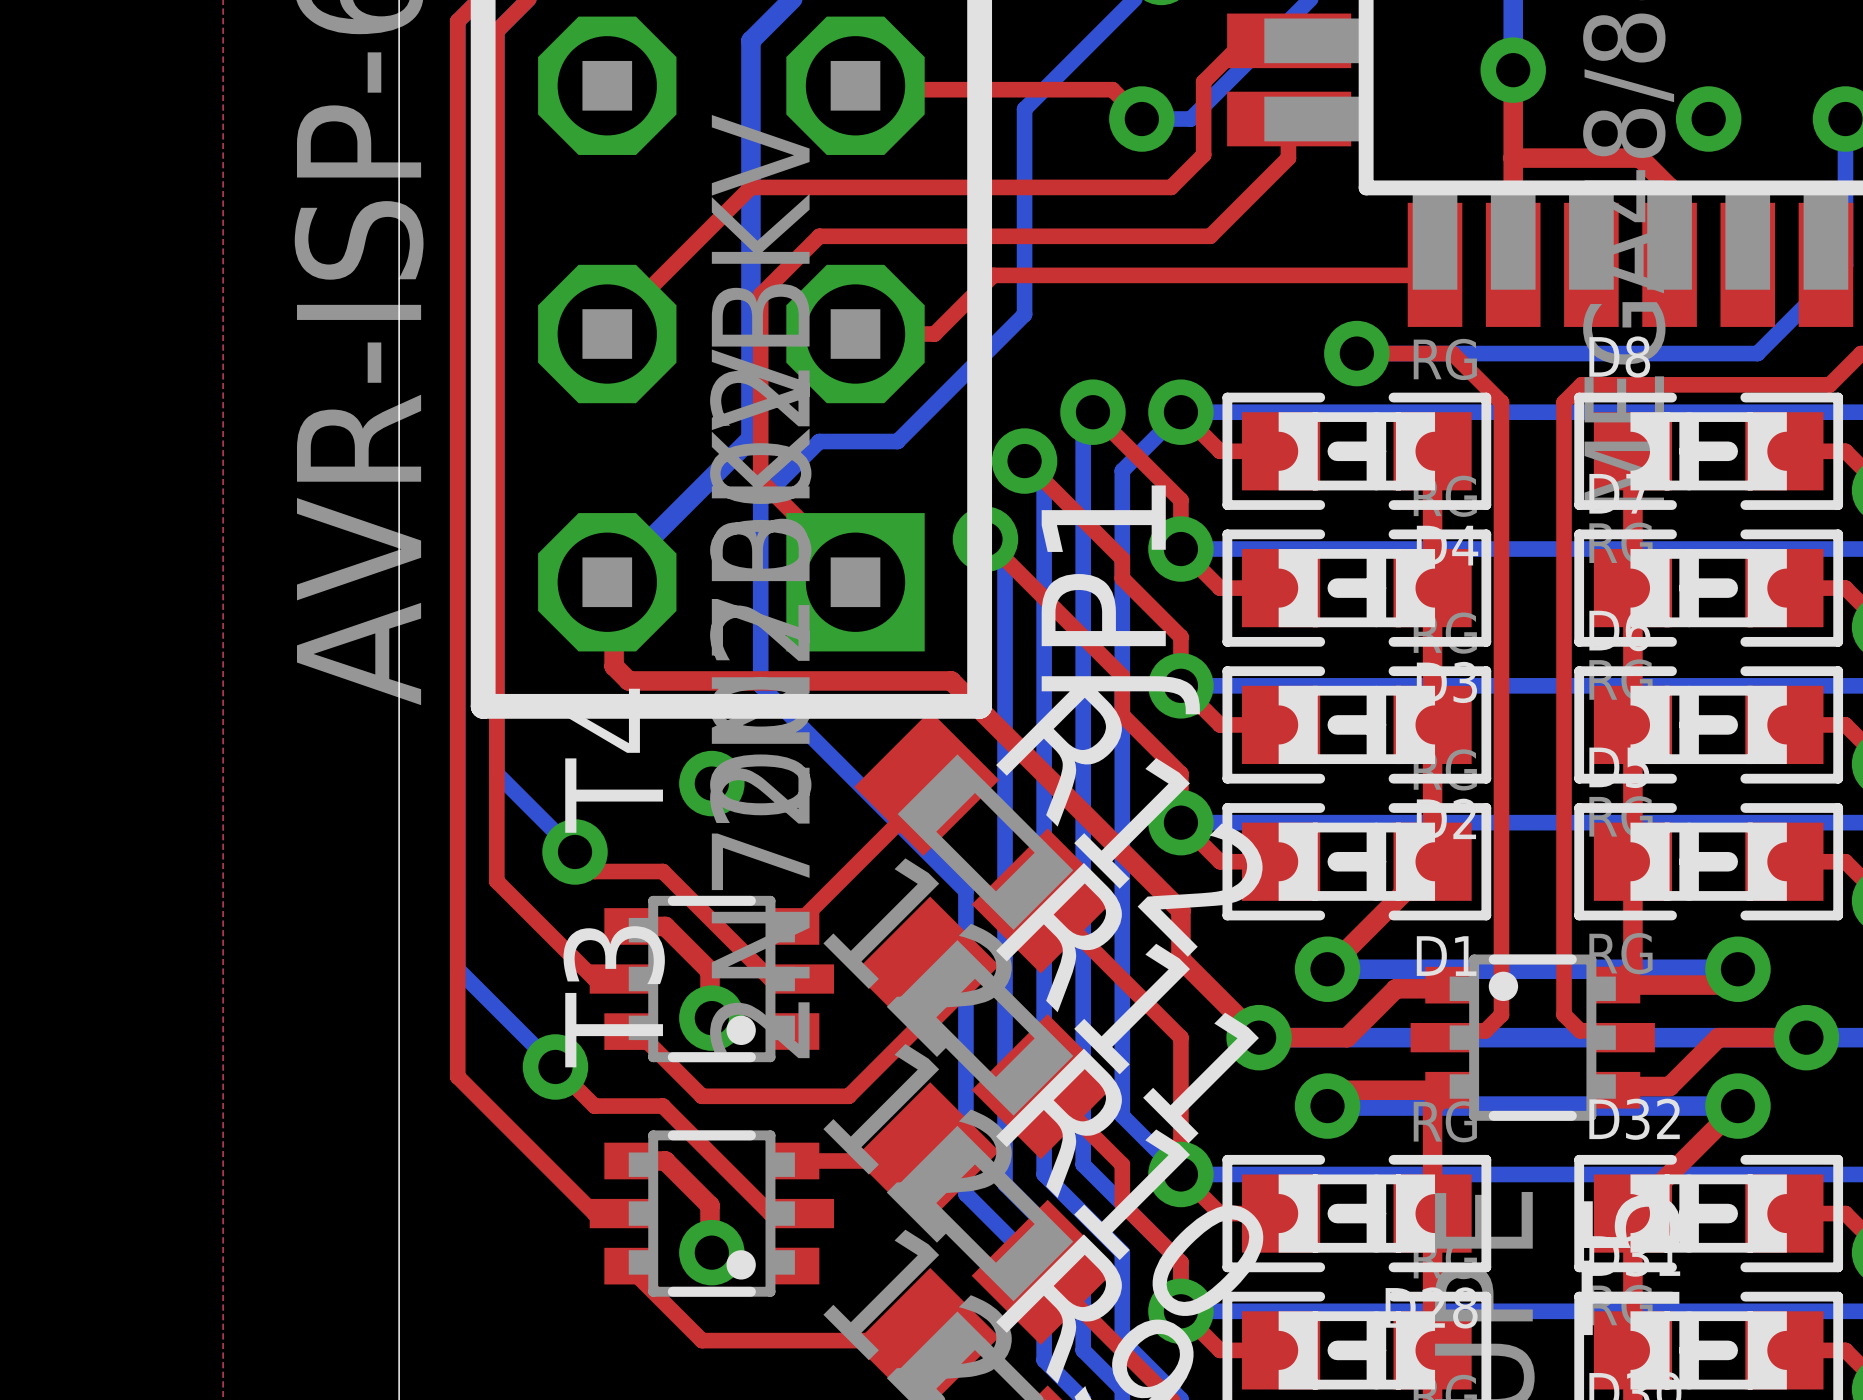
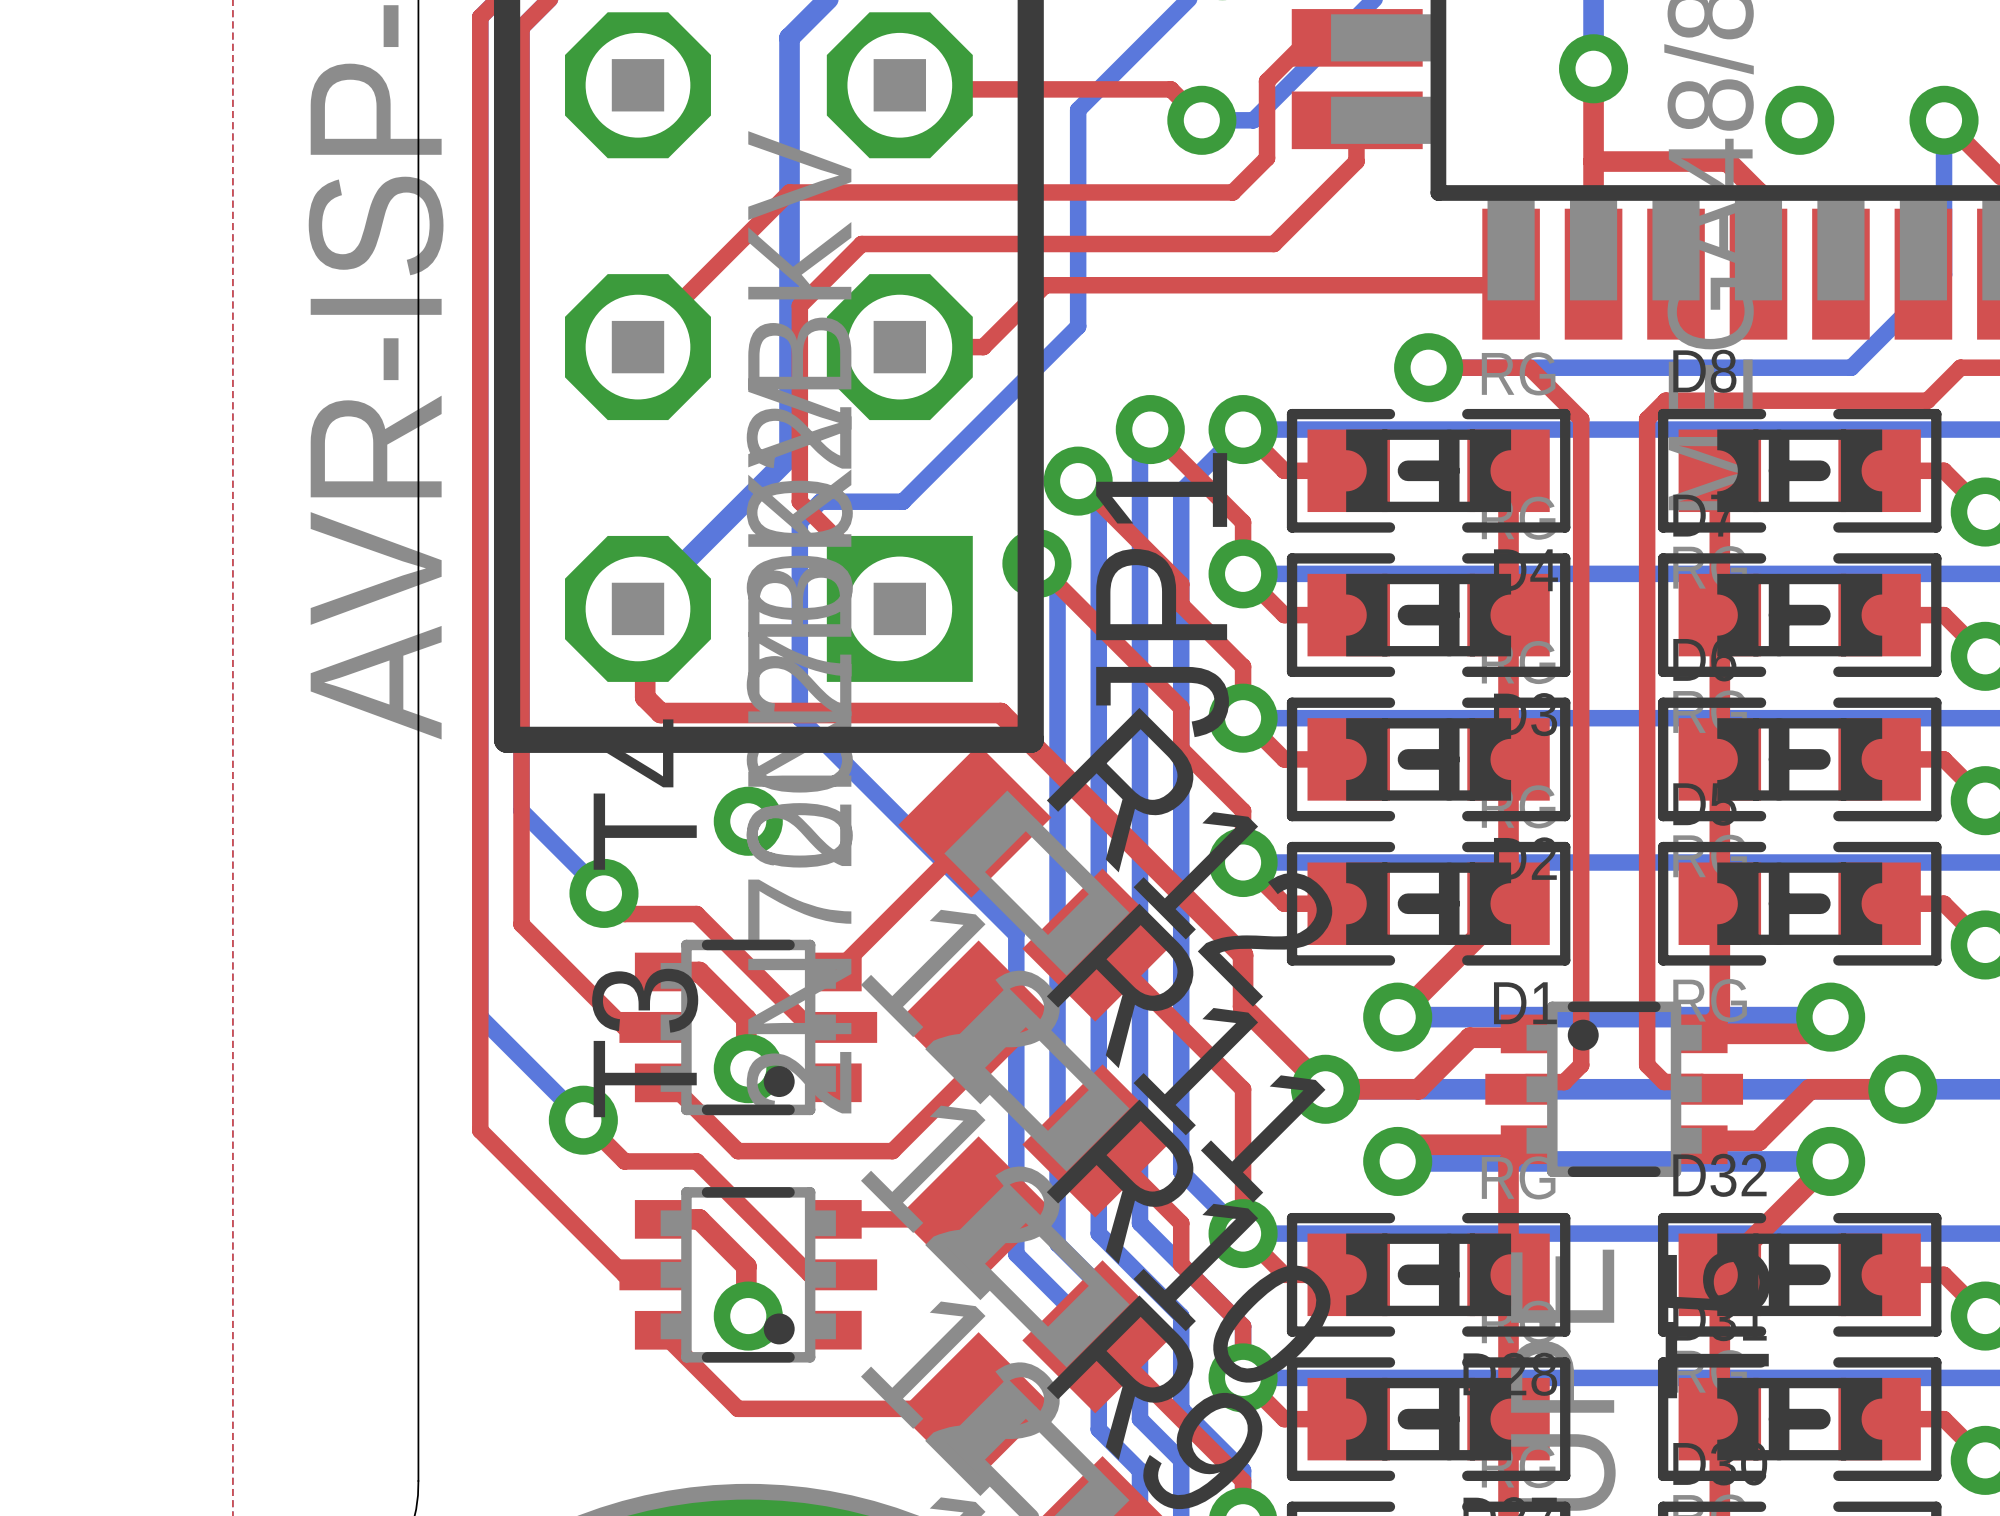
bottom track: (897, 441) (819, 441) (780, 480) -> (944, 460) (902, 501) (820, 501)

